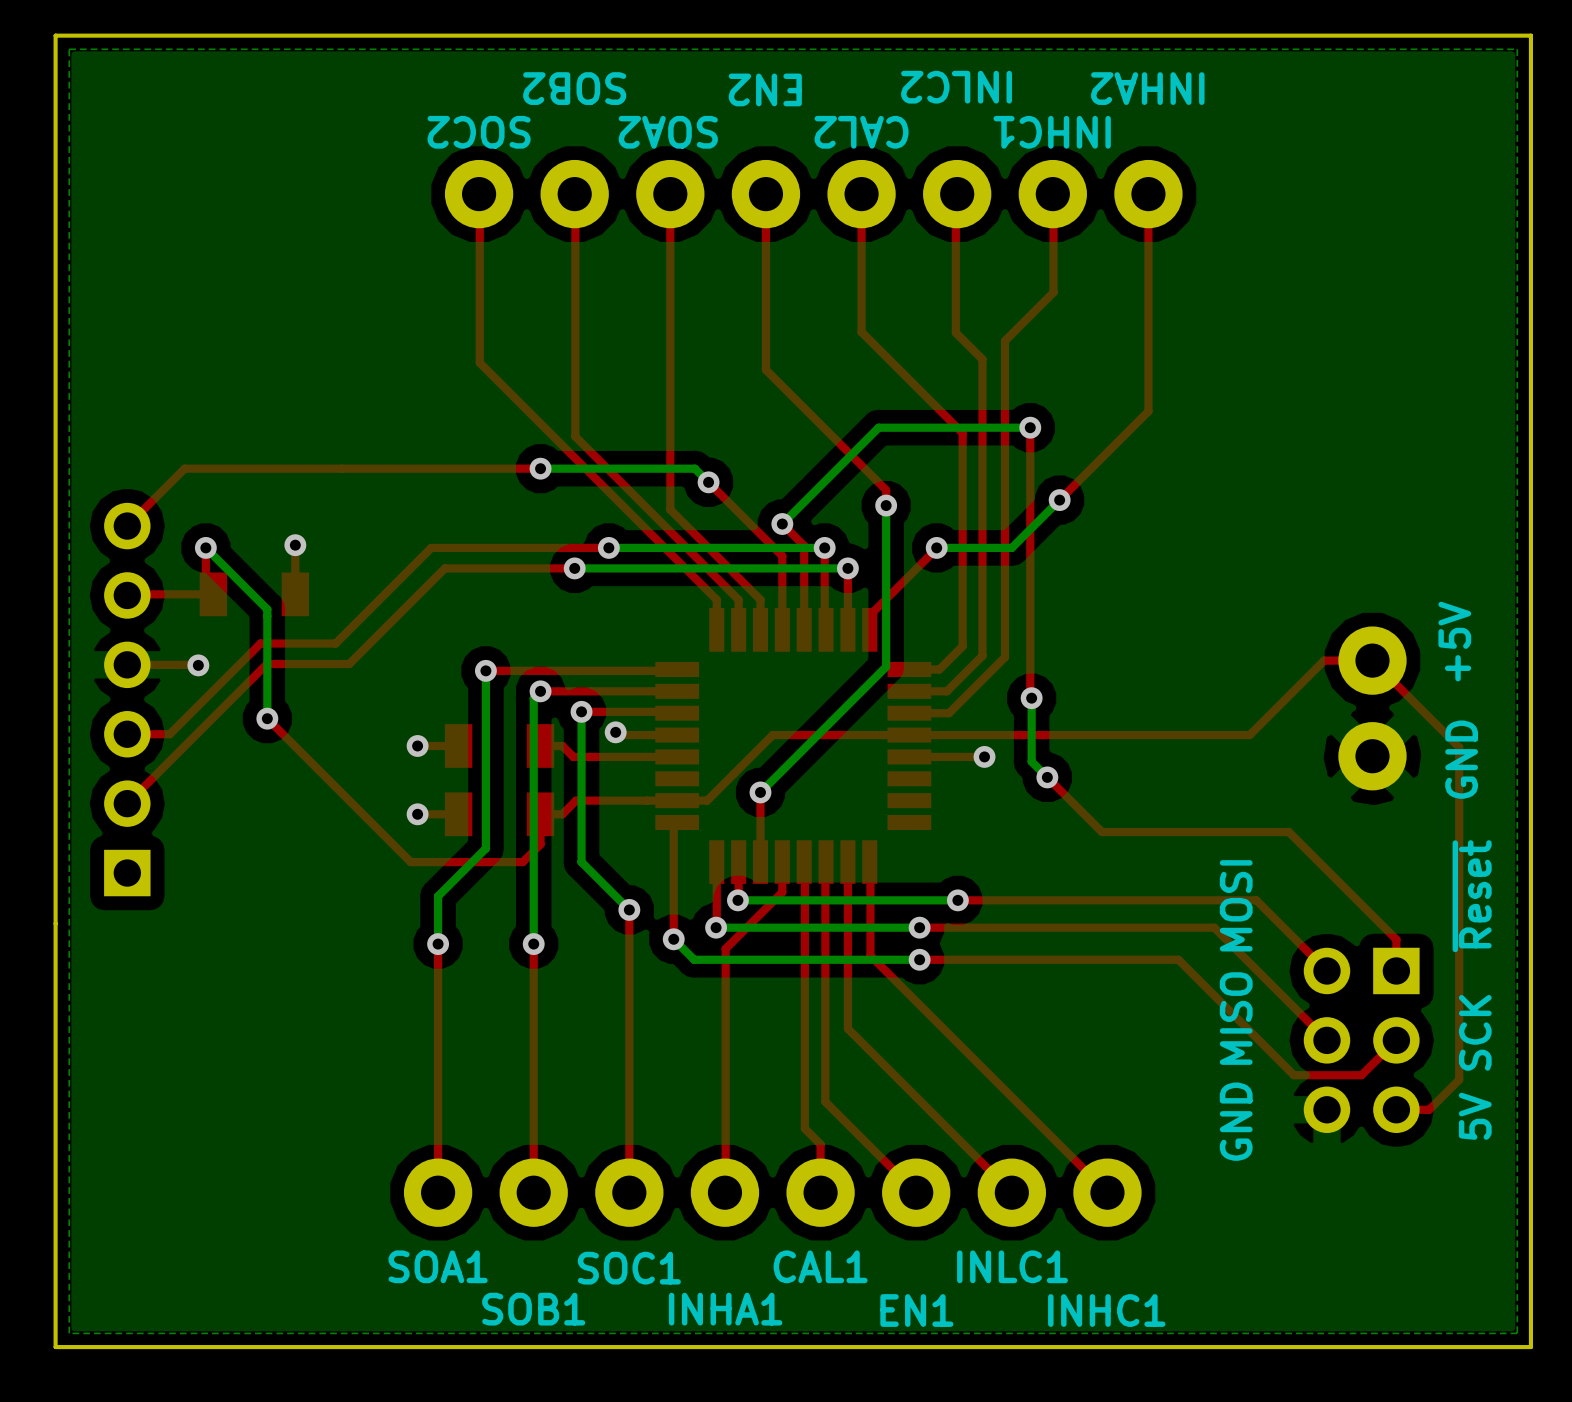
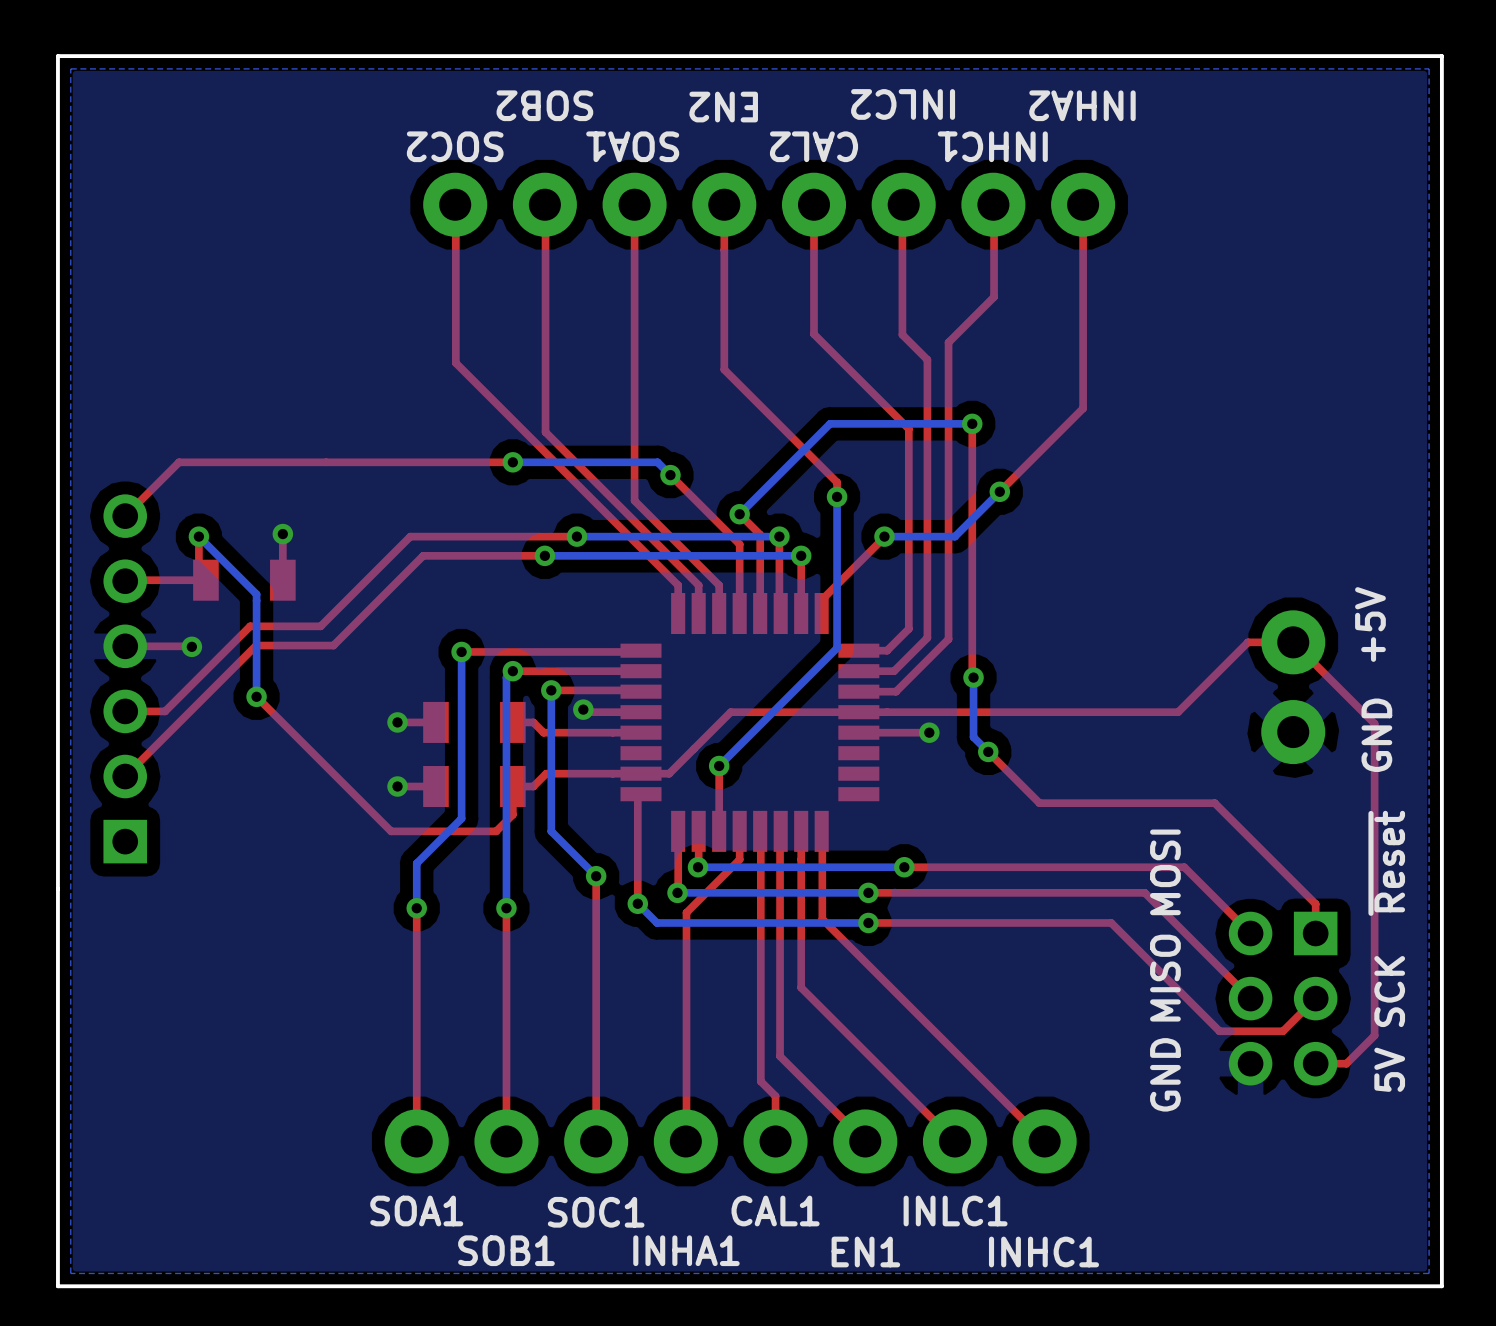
text: SOA2 (668, 132) -> SOA1 (632, 146)

